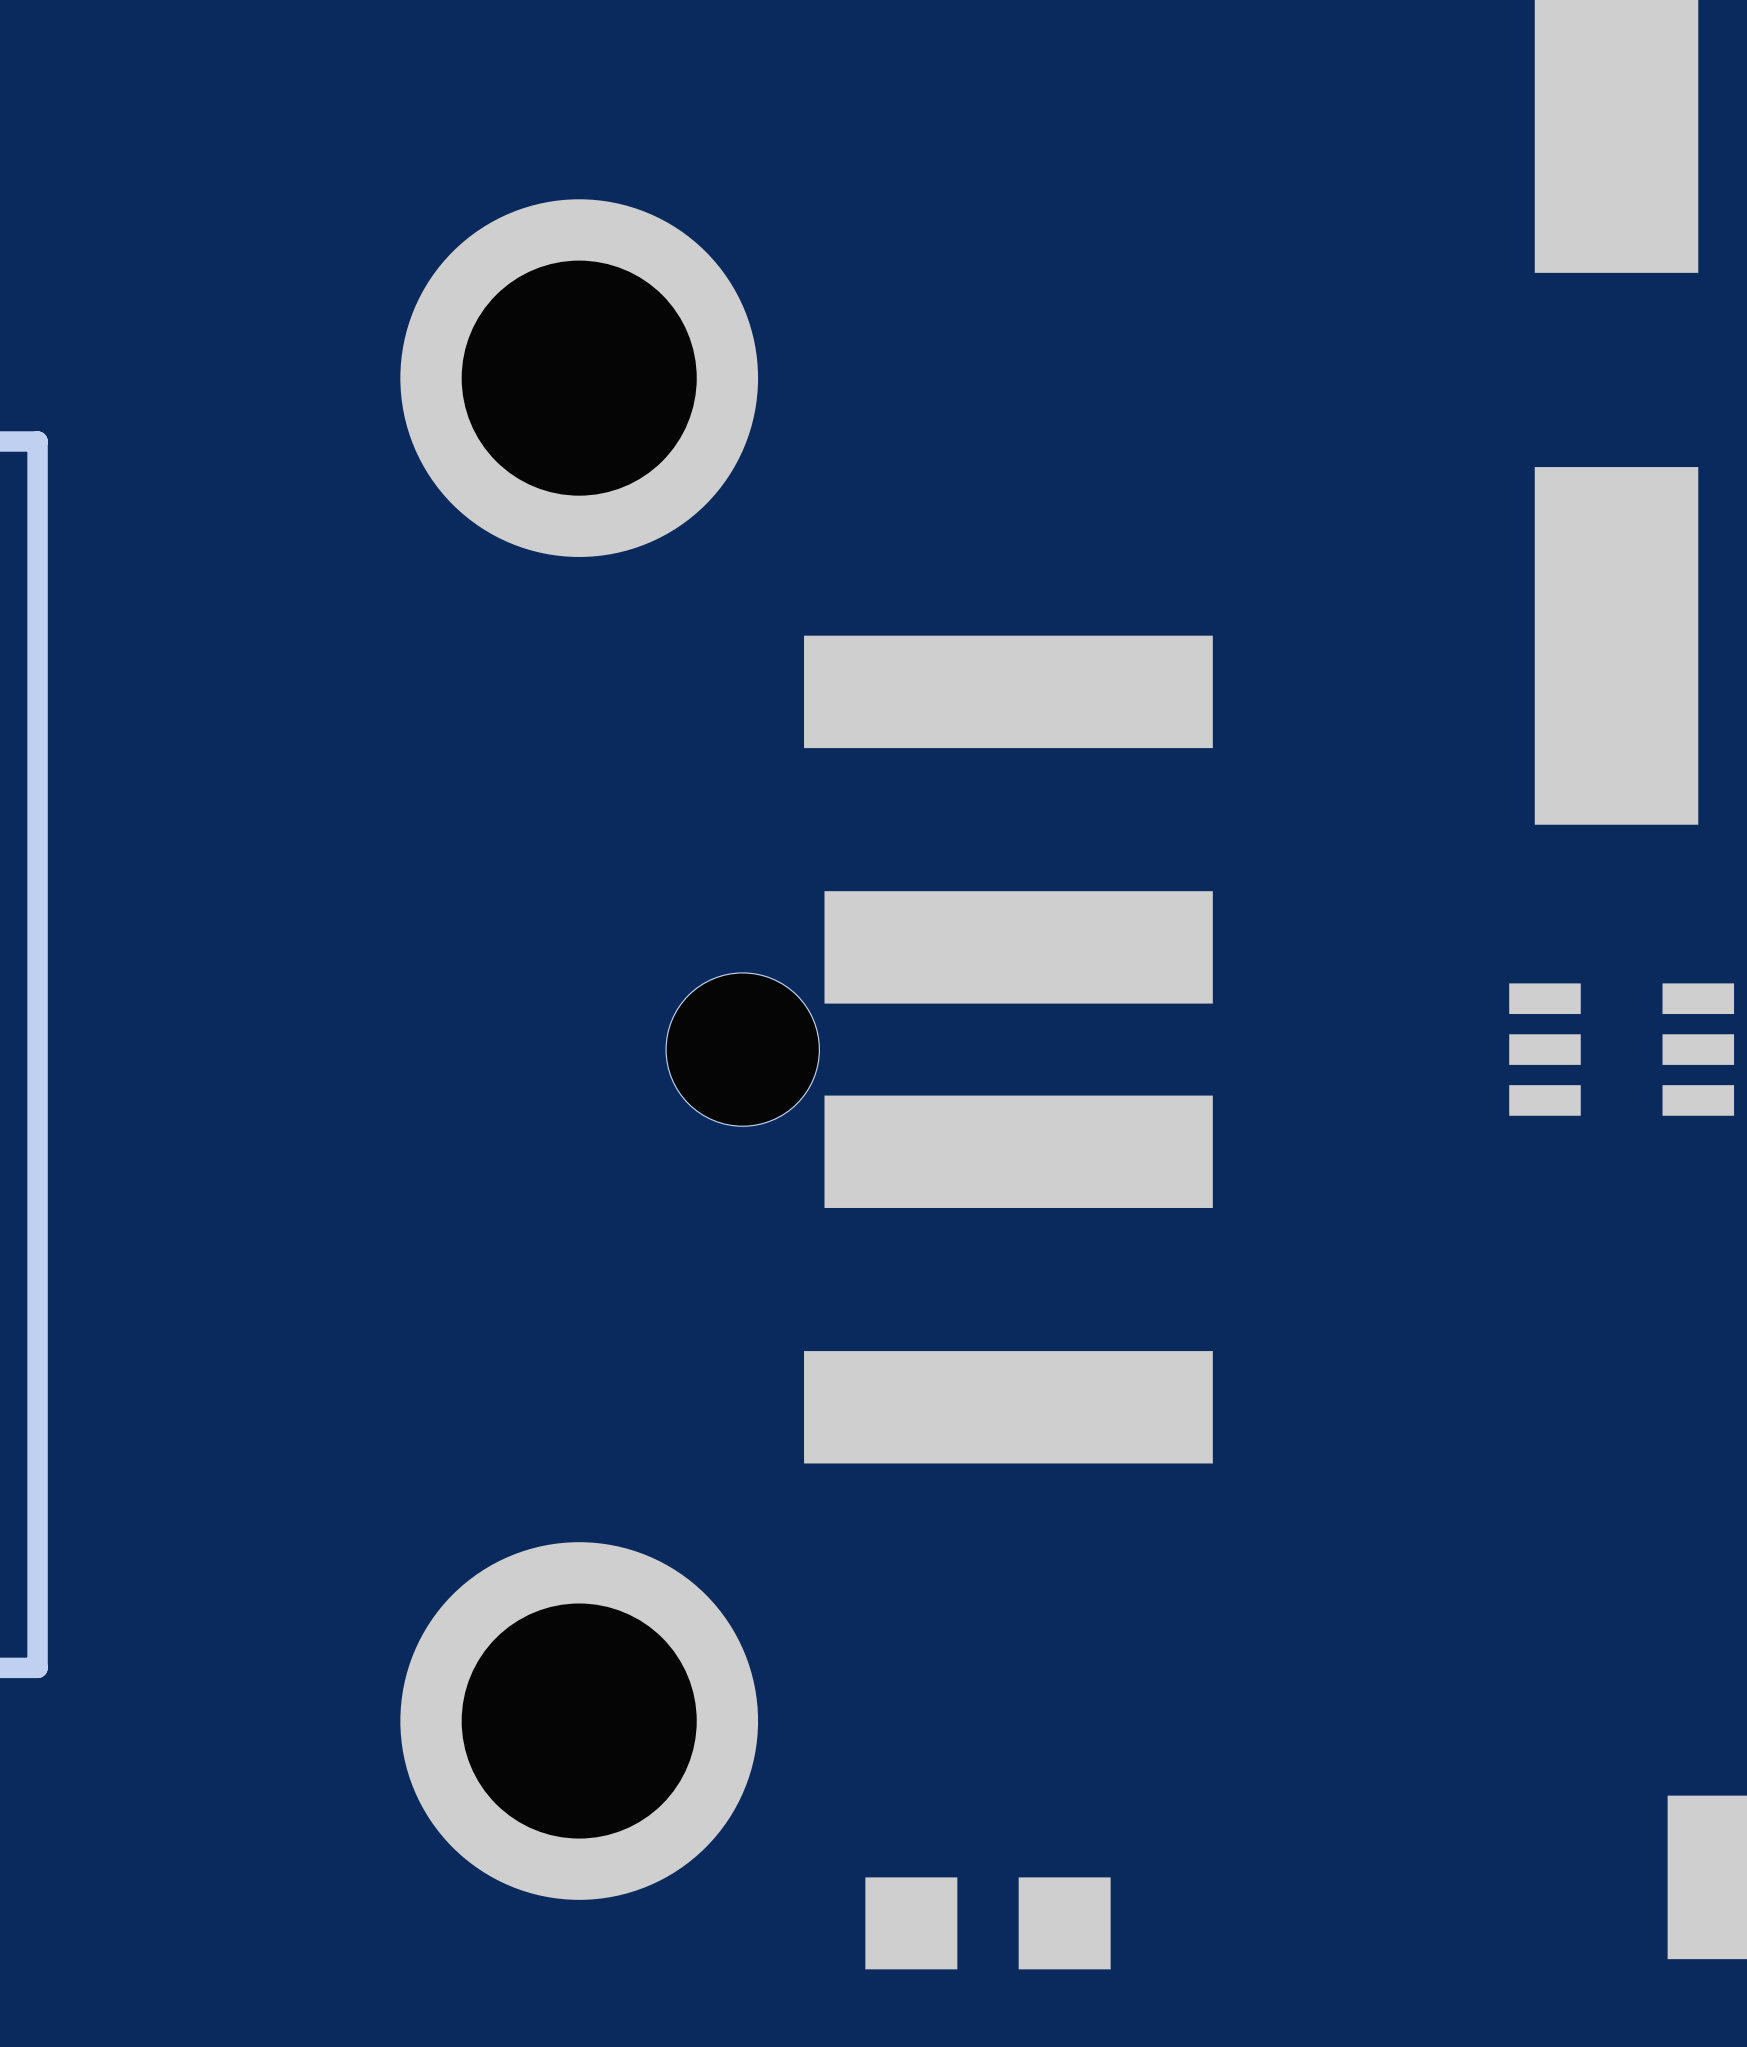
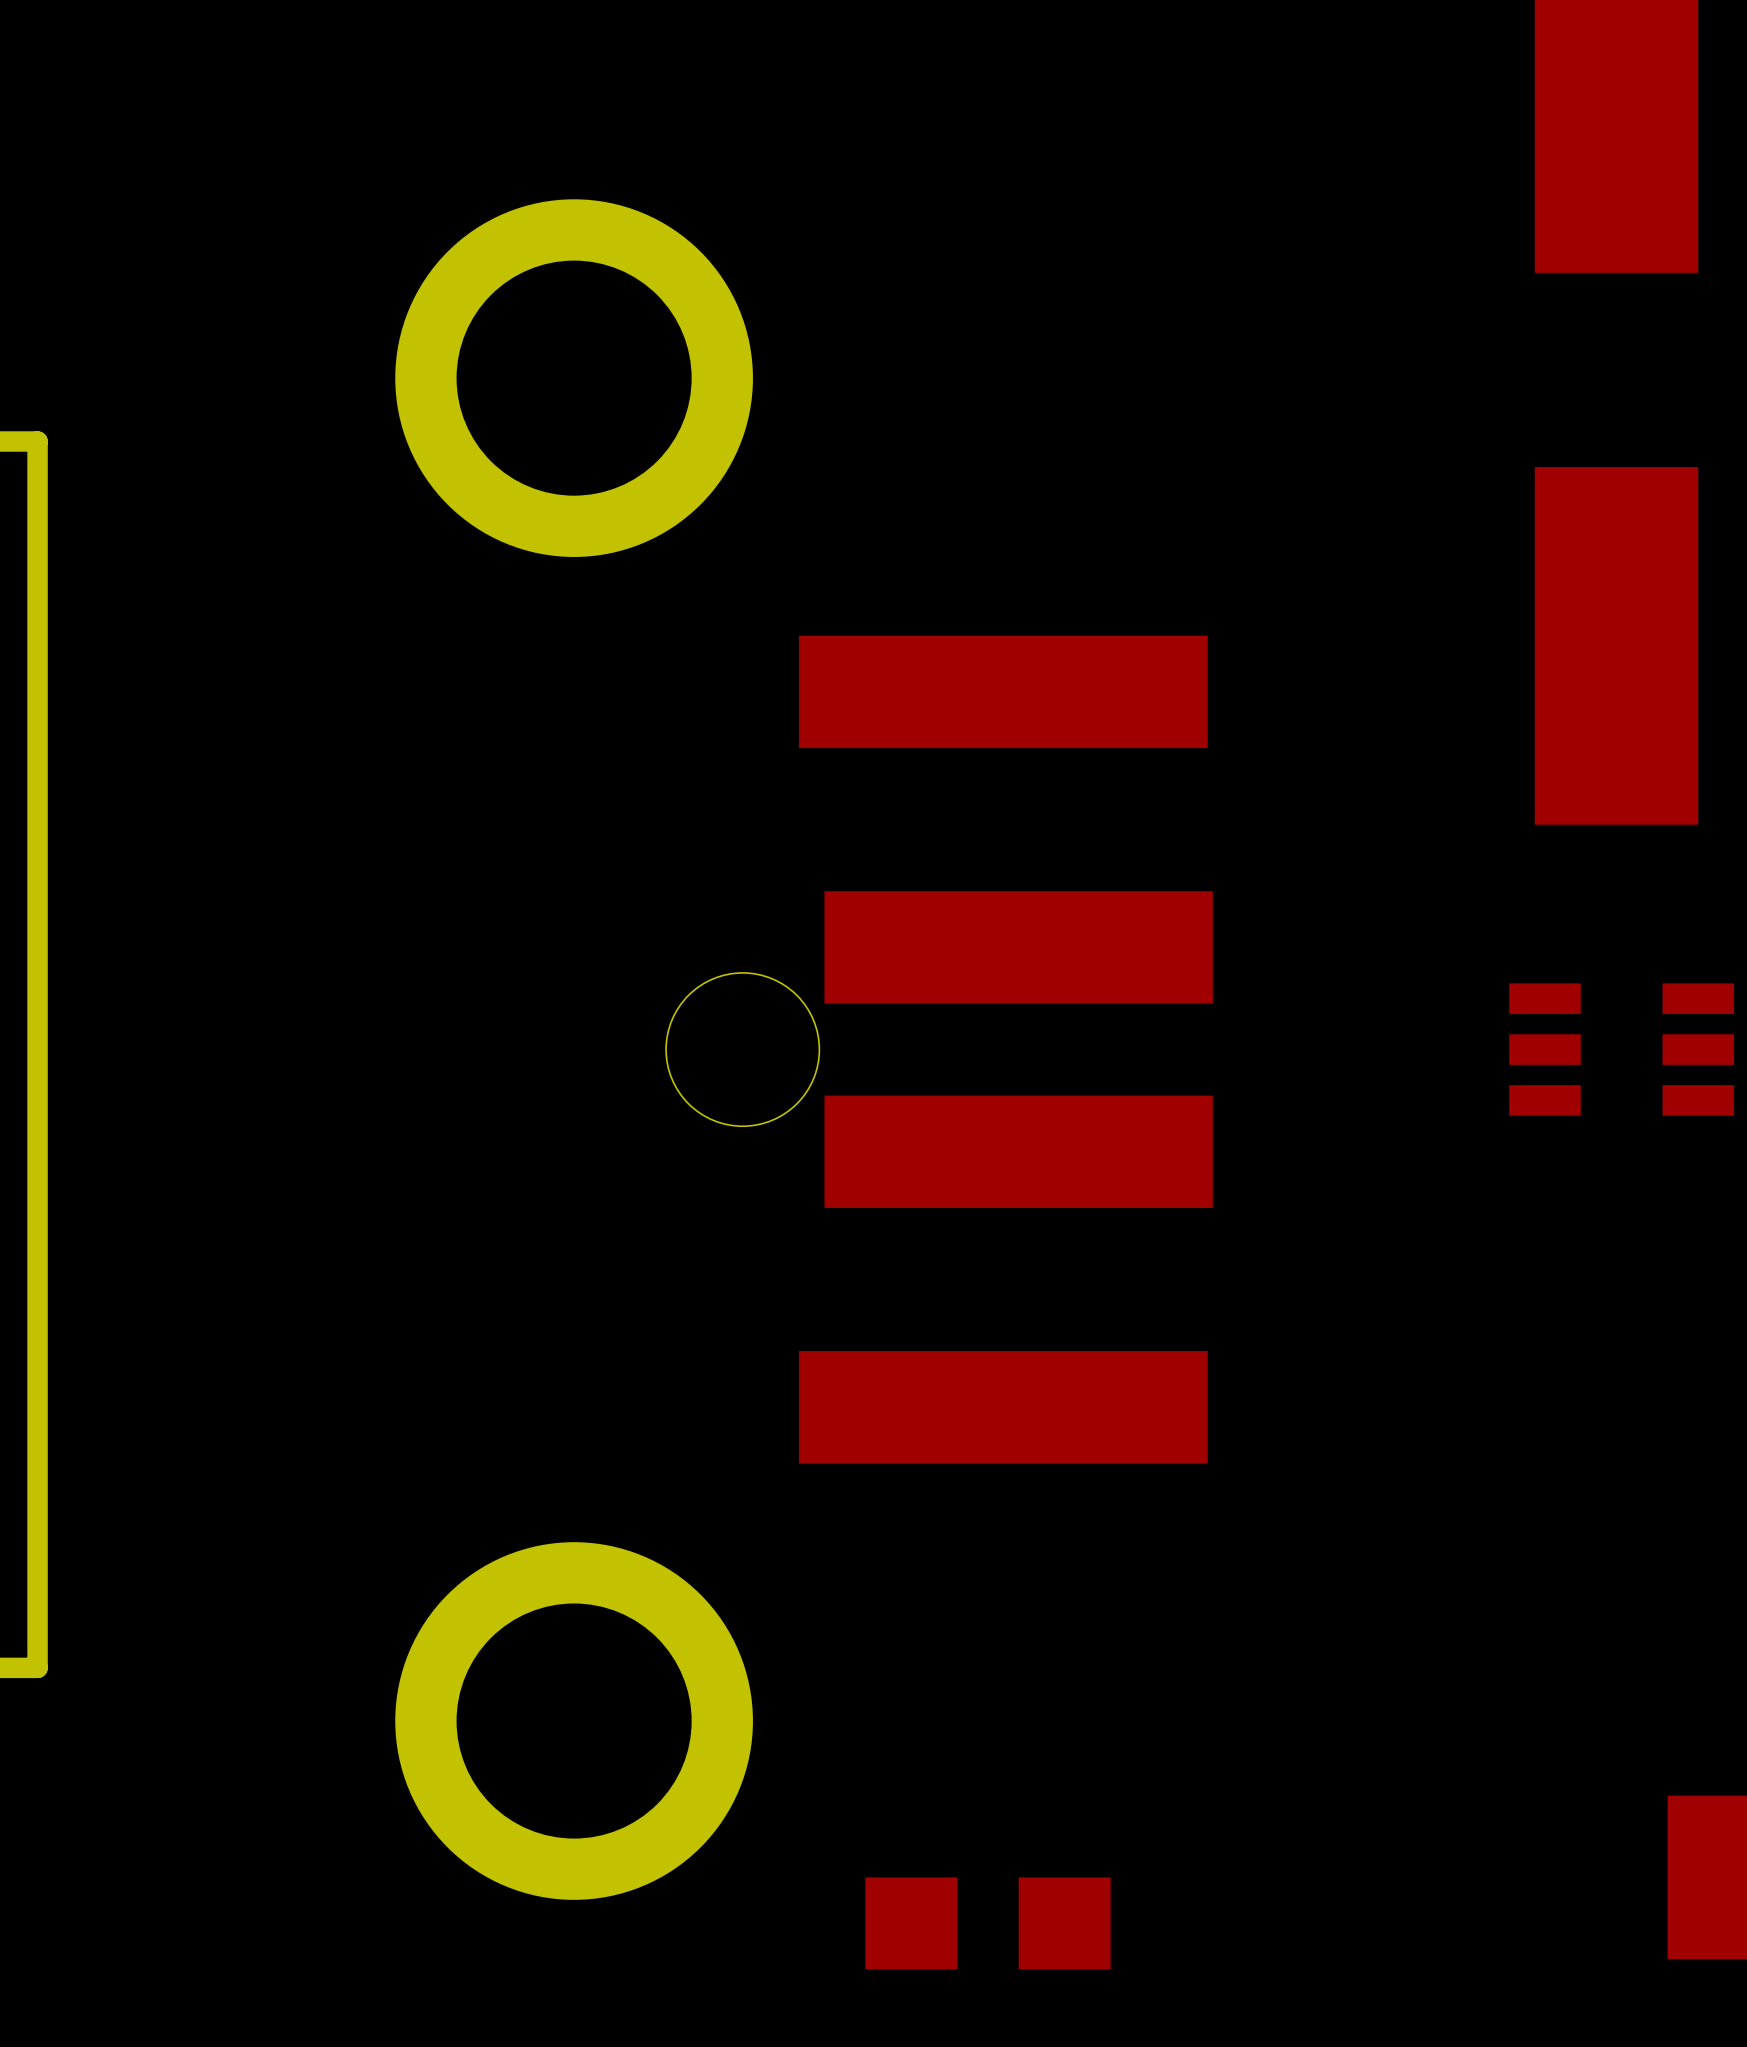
part footprint: [400, 199, 1213, 1900] -> [395, 199, 1213, 1900]

